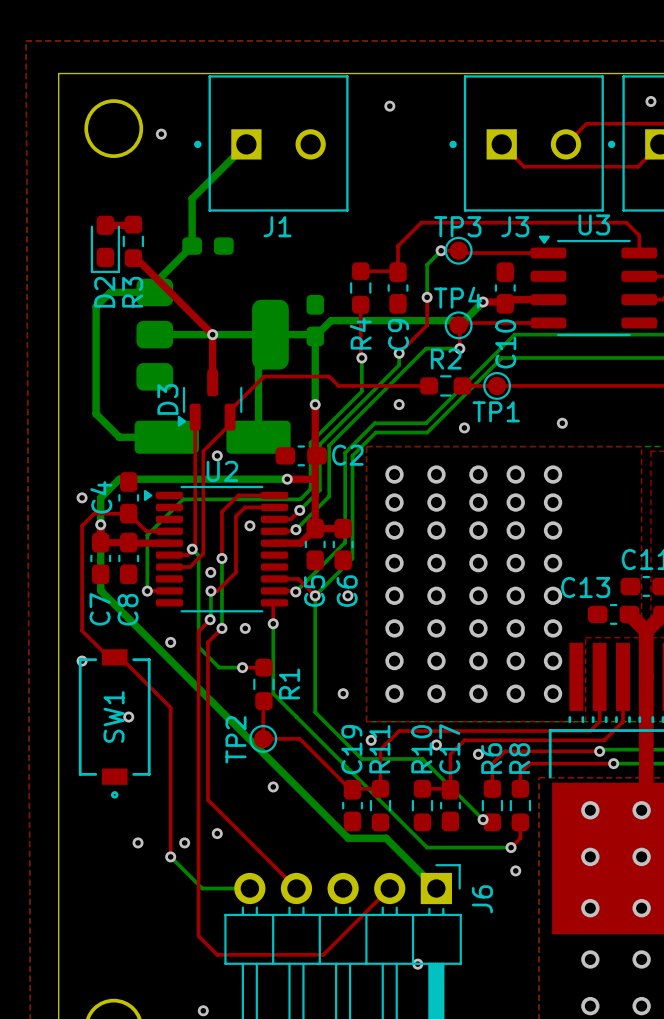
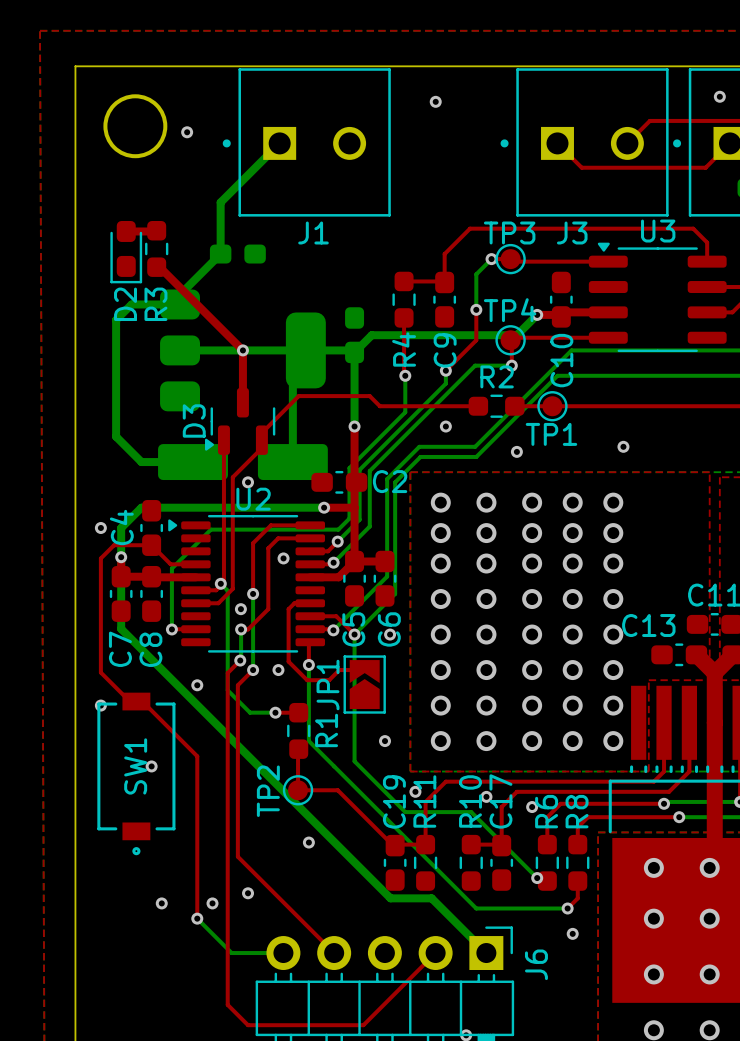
top track: none -> (310, 603) (294, 603) (288, 609) (288, 661) (307, 680) (329, 680) (339, 670) (364, 670)
JP1: none -> (364, 684)

